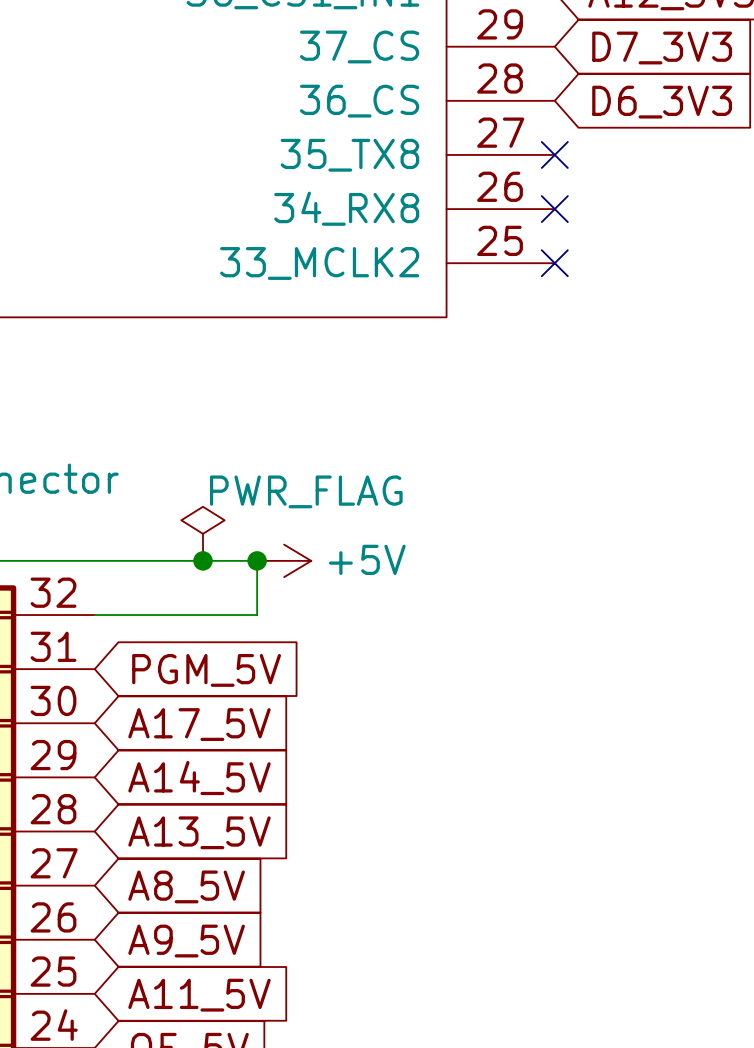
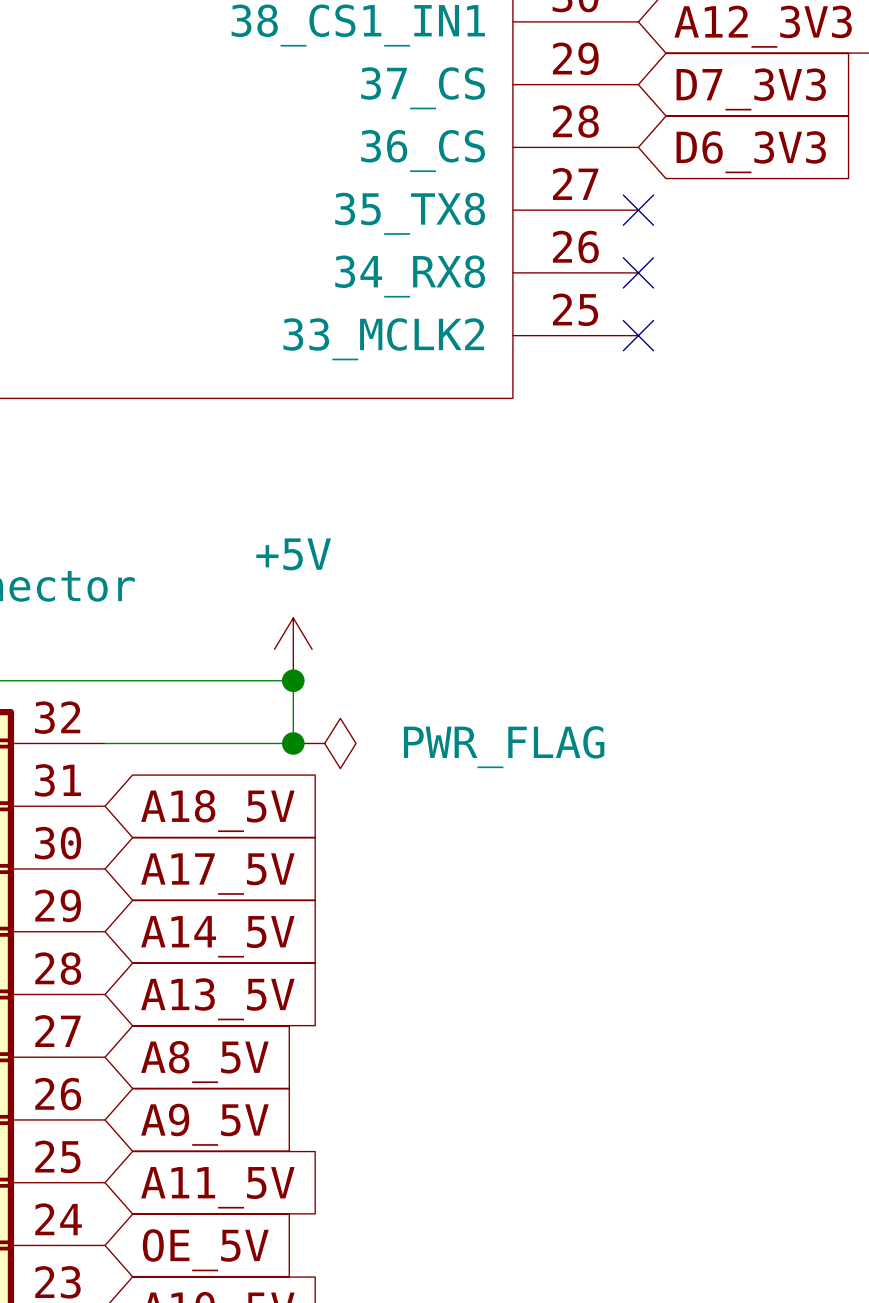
power symbol rotation: 0° (202, 533) -> 90° clockwise (324, 743)
power symbol position: PWR_FLAG (202, 533) -> PWR_FLAG (324, 743)
junction position: (202, 560) -> (293, 743)
power symbol rotation: 0° (284, 560) -> 90° counterclockwise (293, 649)
power symbol position: +5V (284, 560) -> +5V (293, 649)
global label: PGM_5V (206, 670) -> A18_5V (217, 811)

